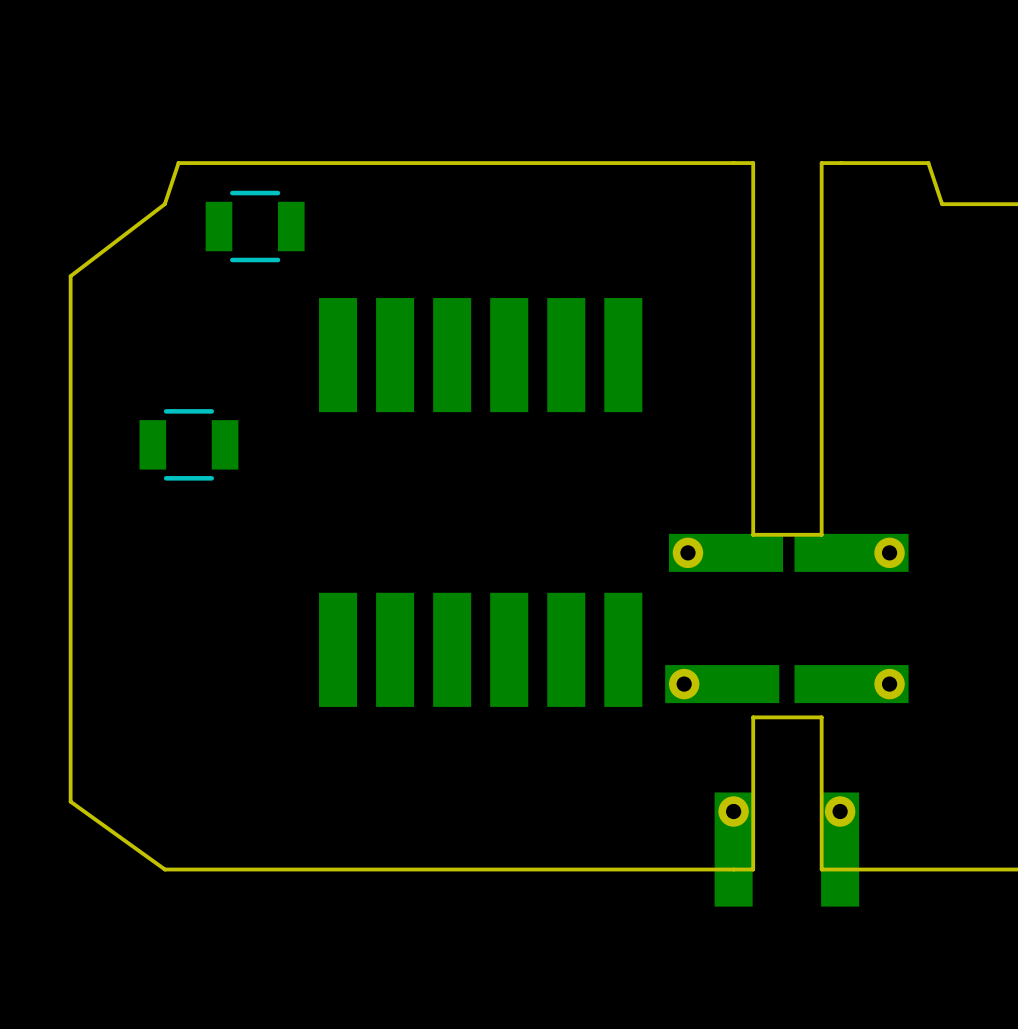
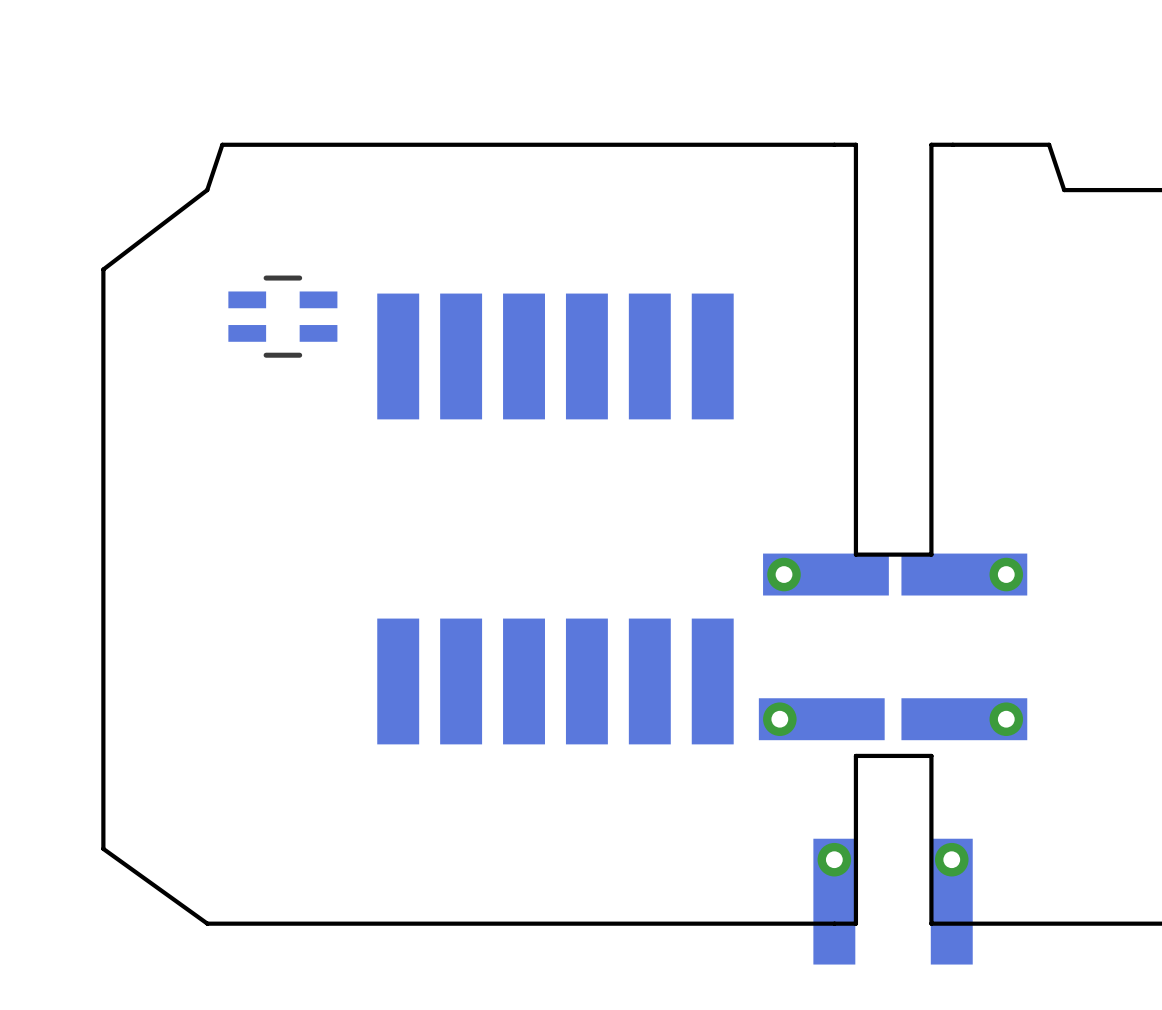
part: (255, 226) -> none
part: none -> (282, 316)
part: (188, 444) -> none

